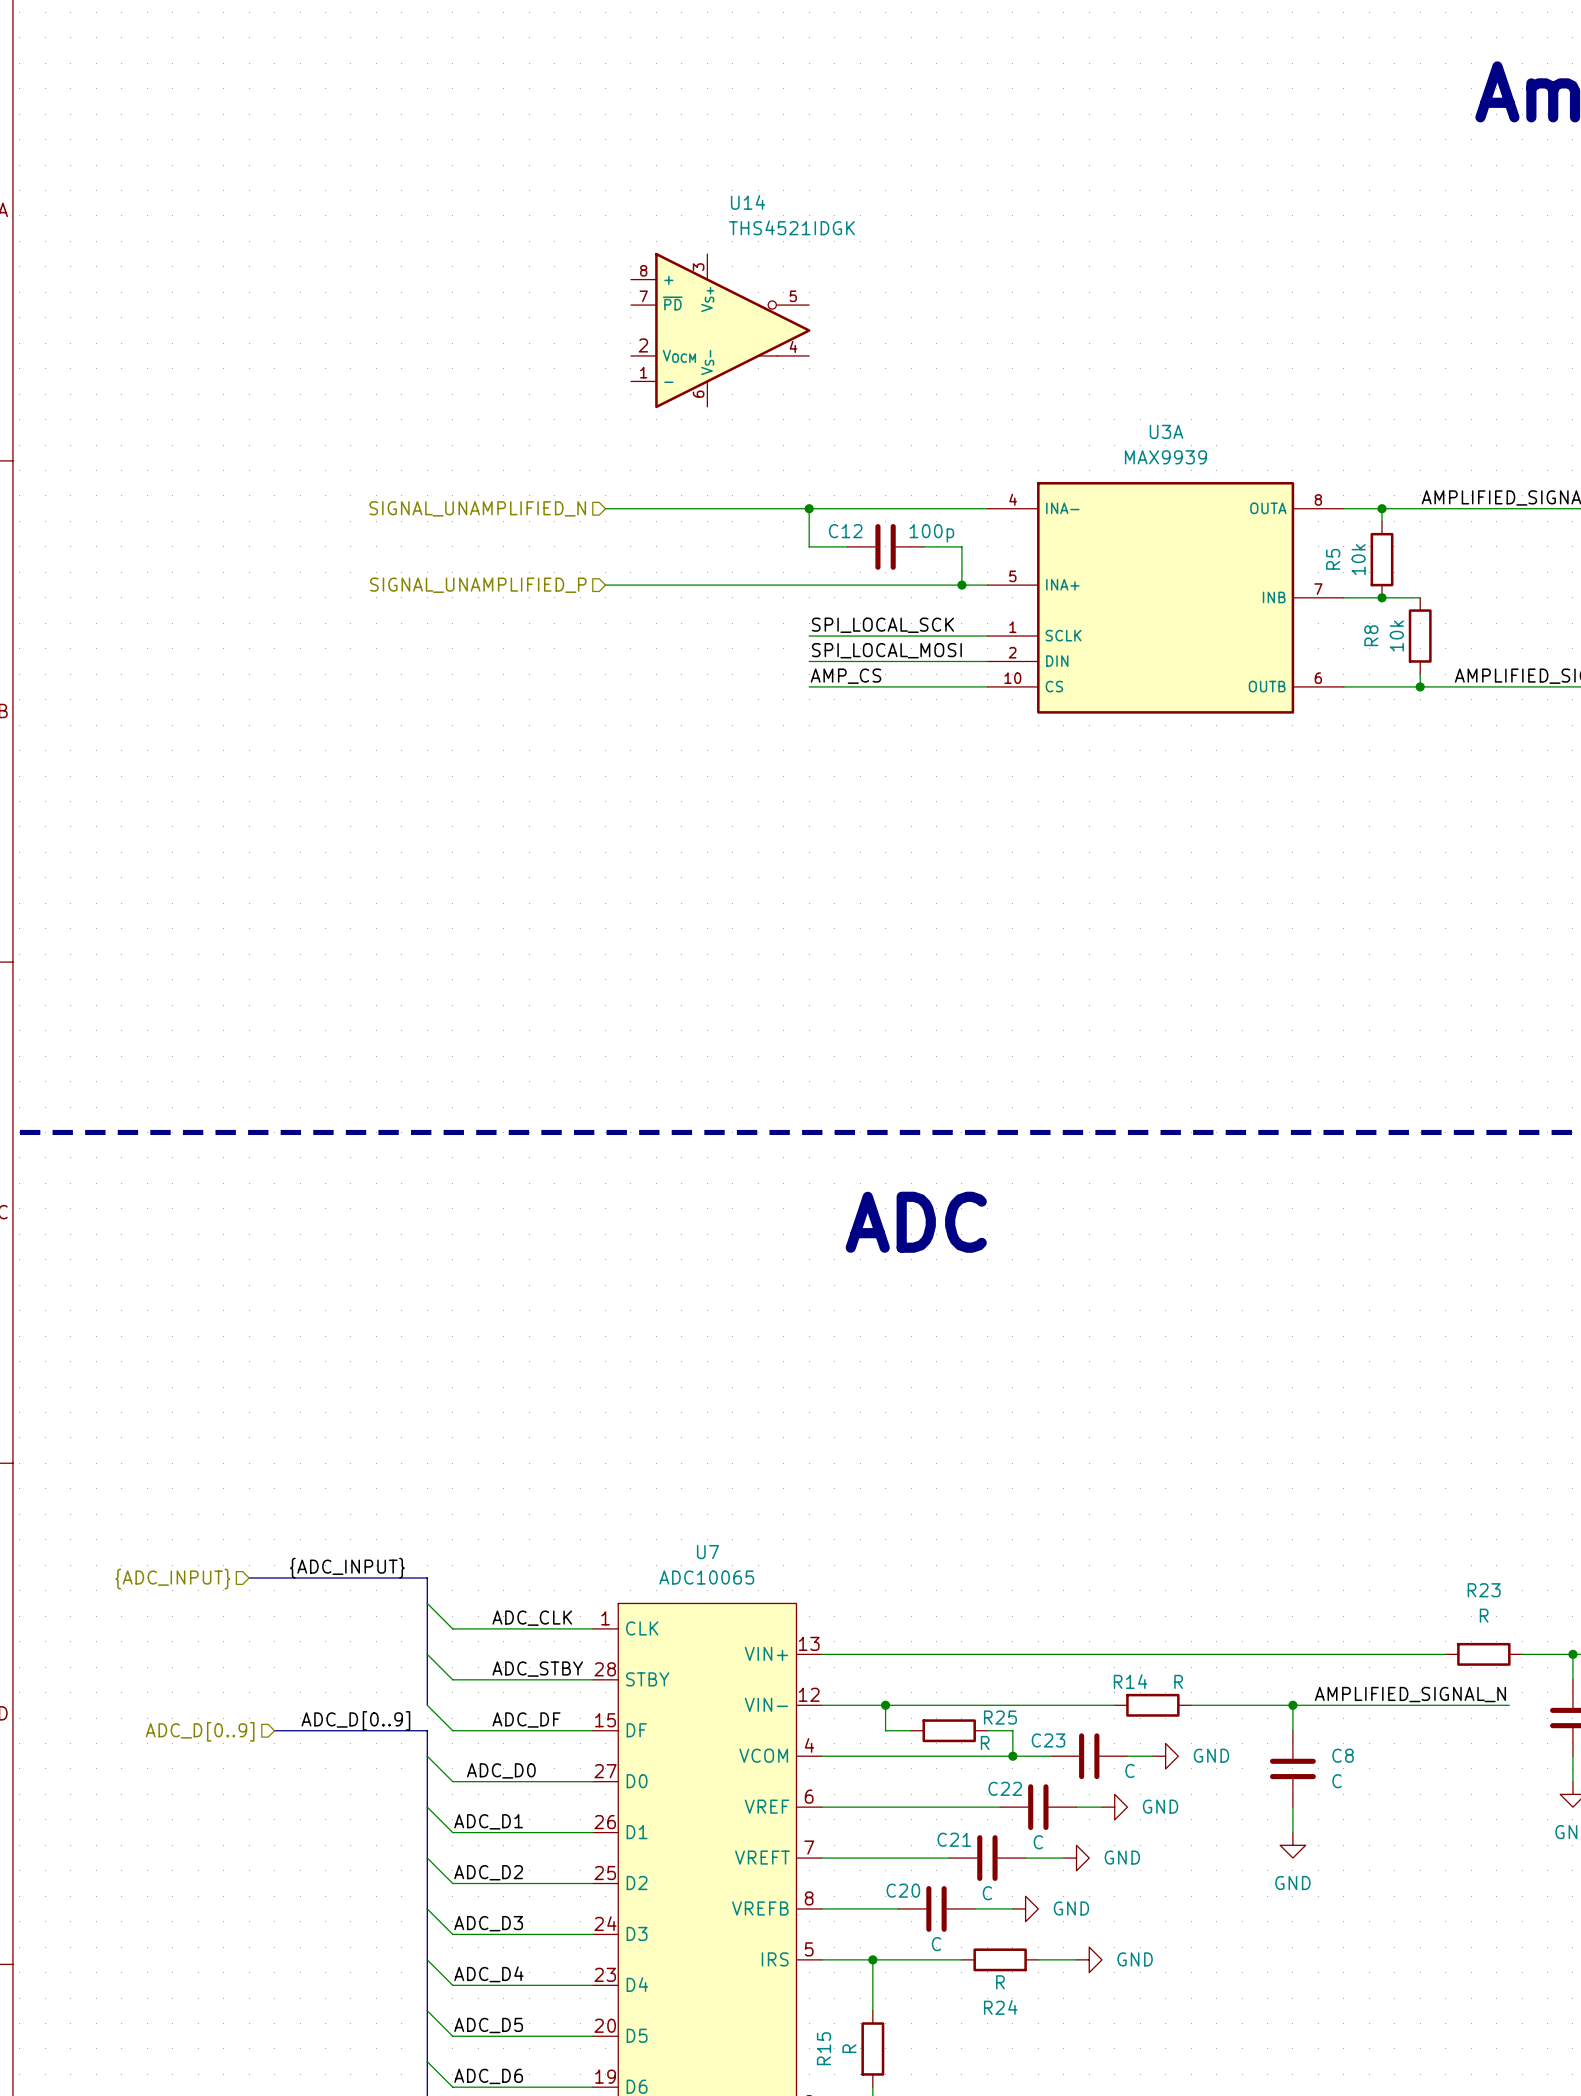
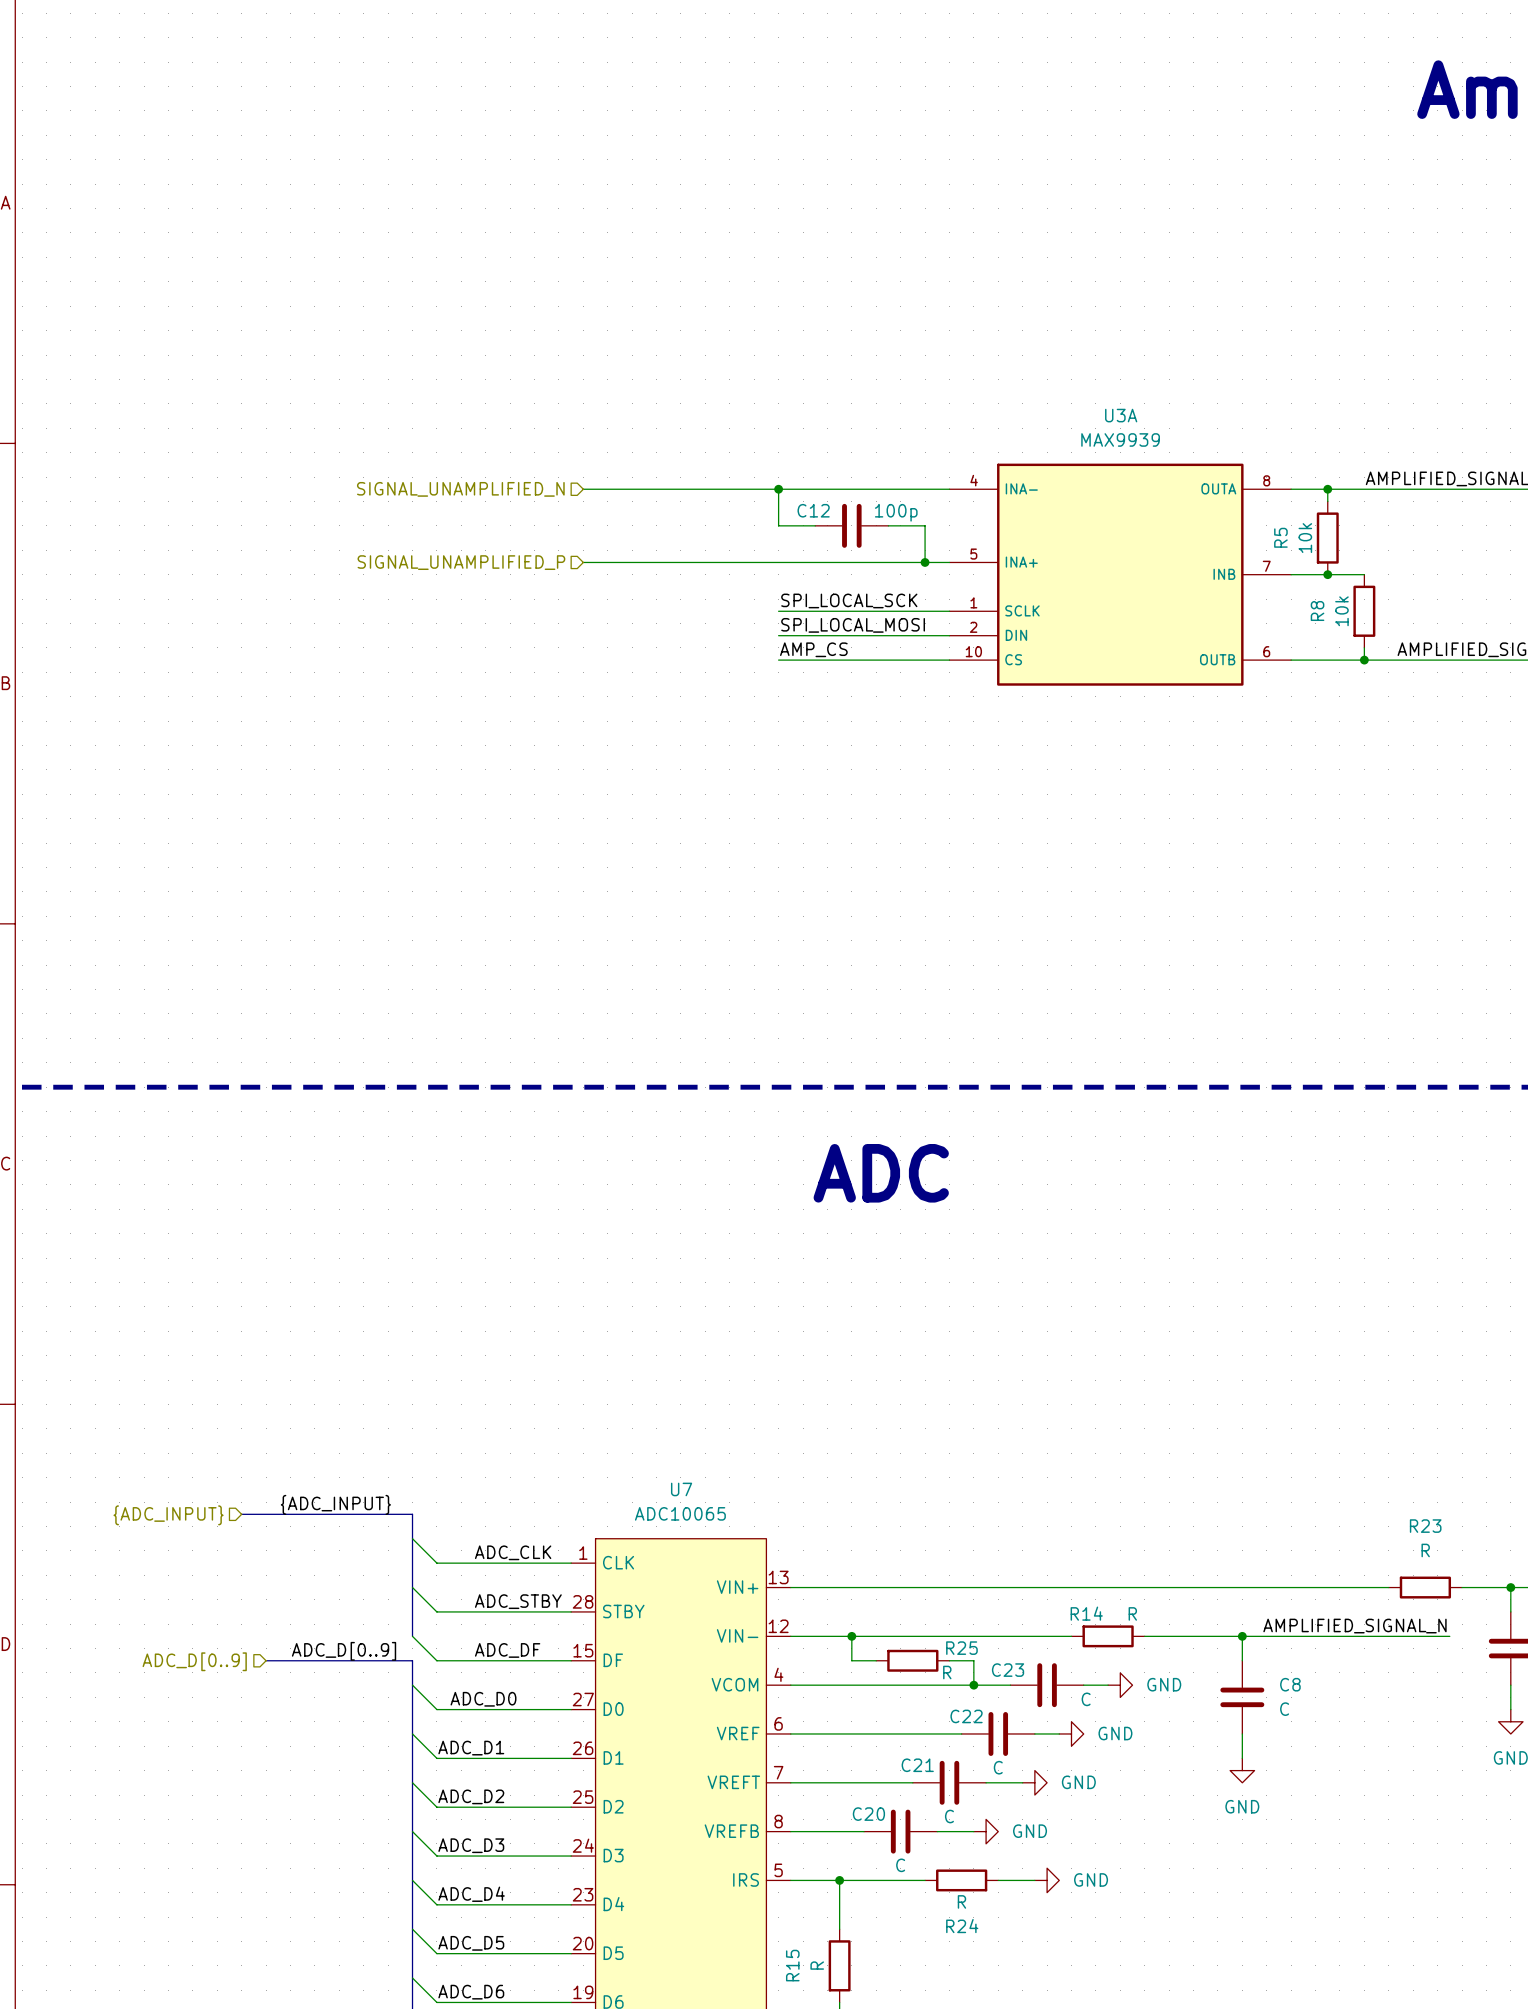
U14: THS4521IDGK (720, 330) -> none

